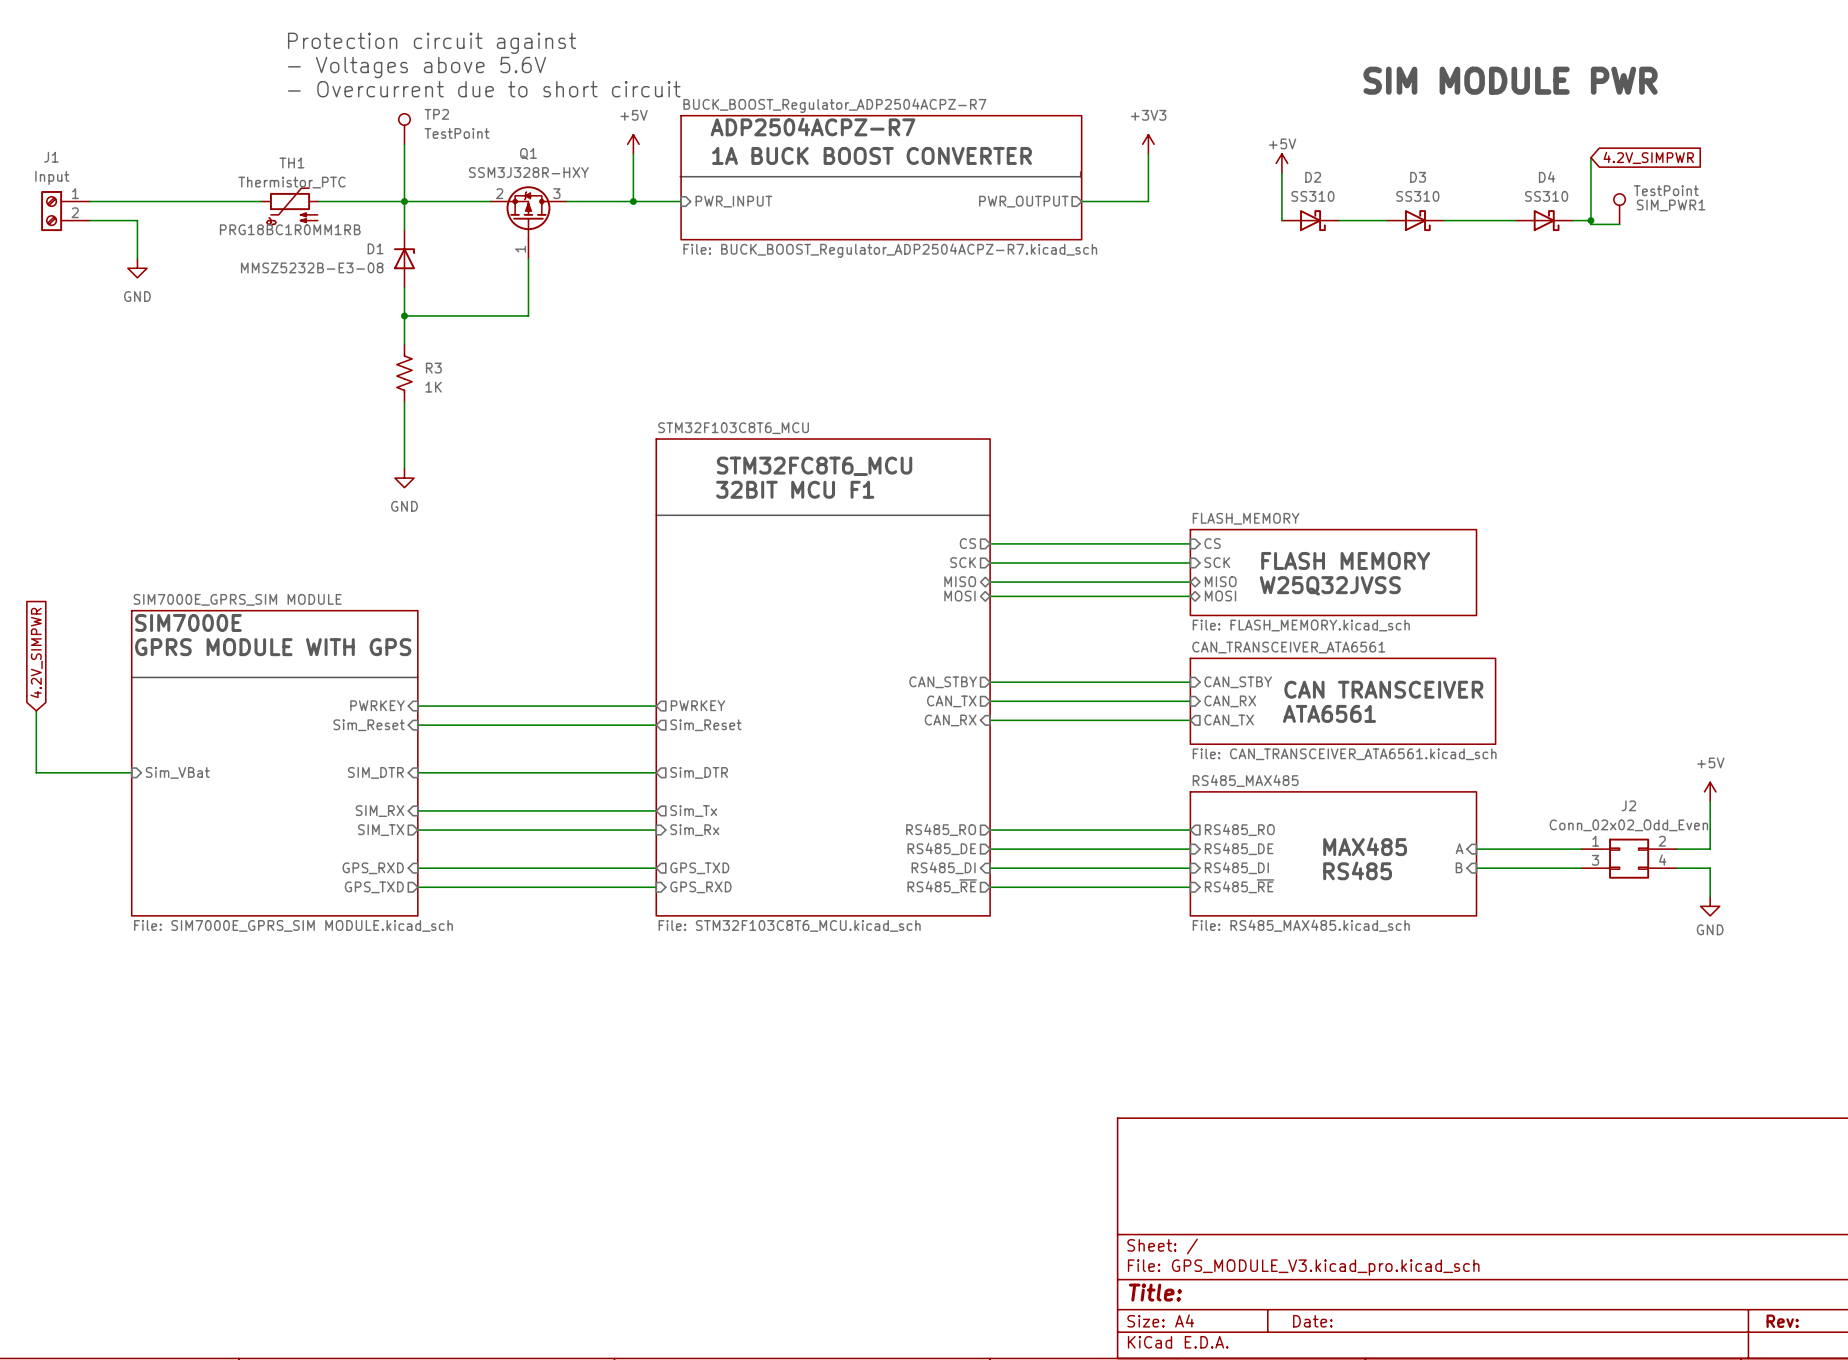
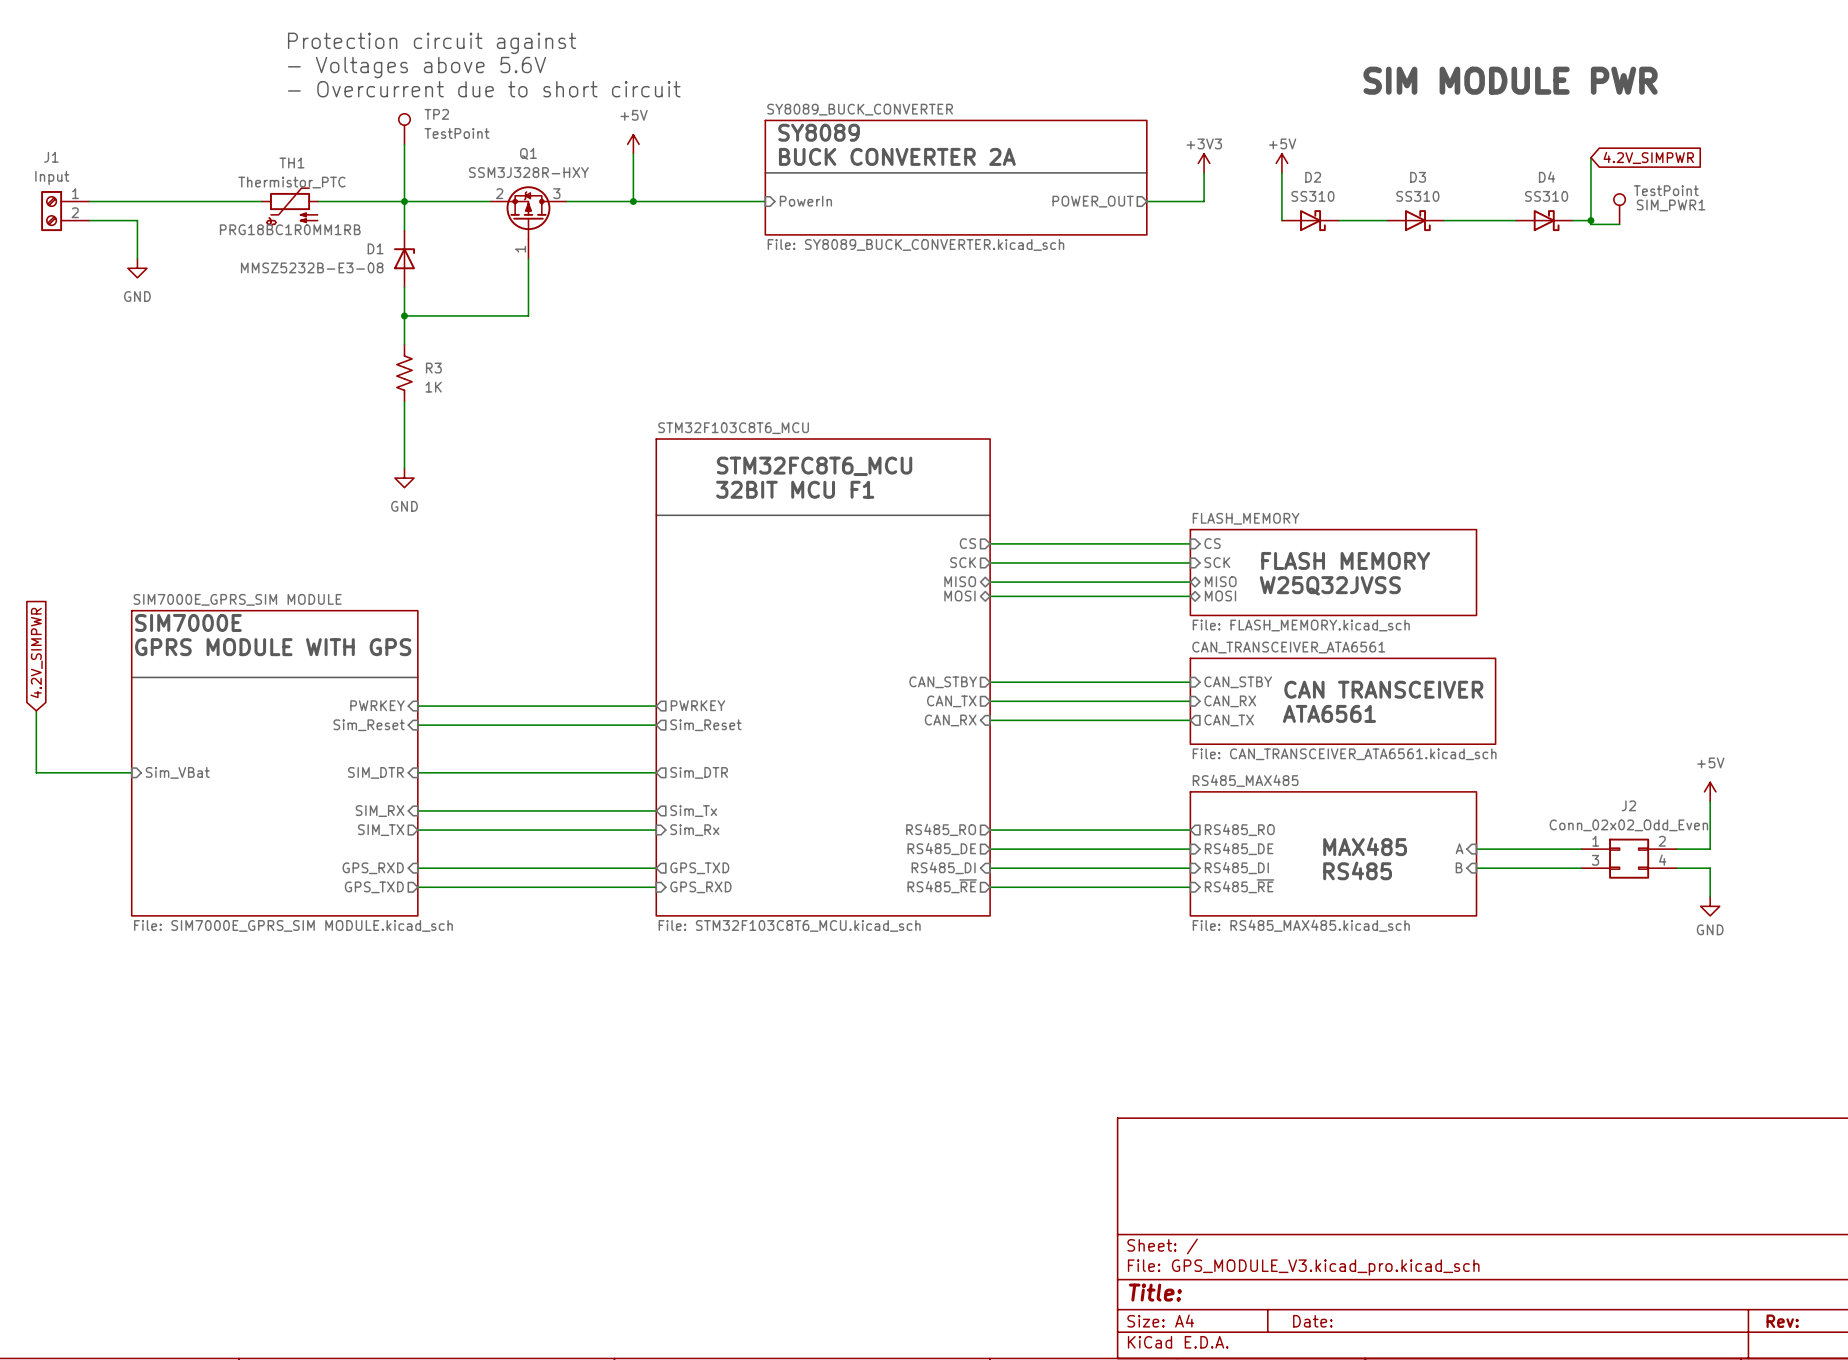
power symbol text position: +3V3 (1148, 115) -> +3V3 (1204, 143)
text: ADP2504ACPZ-R7 (812, 126) -> none
text: none -> SY8089 (819, 132)
power symbol position: +3V3 (1148, 144) -> +3V3 (1204, 163)
wire: (1148, 153) (1148, 201) -> (1204, 172) (1204, 201) (1148, 201)
text: 1A BUCK BOOST CONVERTER (871, 155) -> BUCK CONVERTER 2A (897, 156)
line: (1080, 171) (1080, 176) (680, 176) -> none
line: none -> (765, 172) (1146, 172)
sheet BUCK_BOOST_Regulator_ADP2504ACPZ-R7: File: BUCK_BOOST_Regulator_ADP2504ACPZ-R7.kicad_sch (881, 177) -> none
sheet SY8089_BUCK_CONVERTER: none -> File: SY8089_BUCK_CONVERTER.kicad_sch (956, 177)
wire: none -> (681, 201) (765, 201)
sheet pin: PWR_INPUT (733, 201) -> none
sheet pin: none -> PowerIn (805, 201)
sheet pin: PWR_OUTPUT (1023, 201) -> POWER_OUT (1093, 201)
wire: (1081, 201) (1146, 201) -> none

